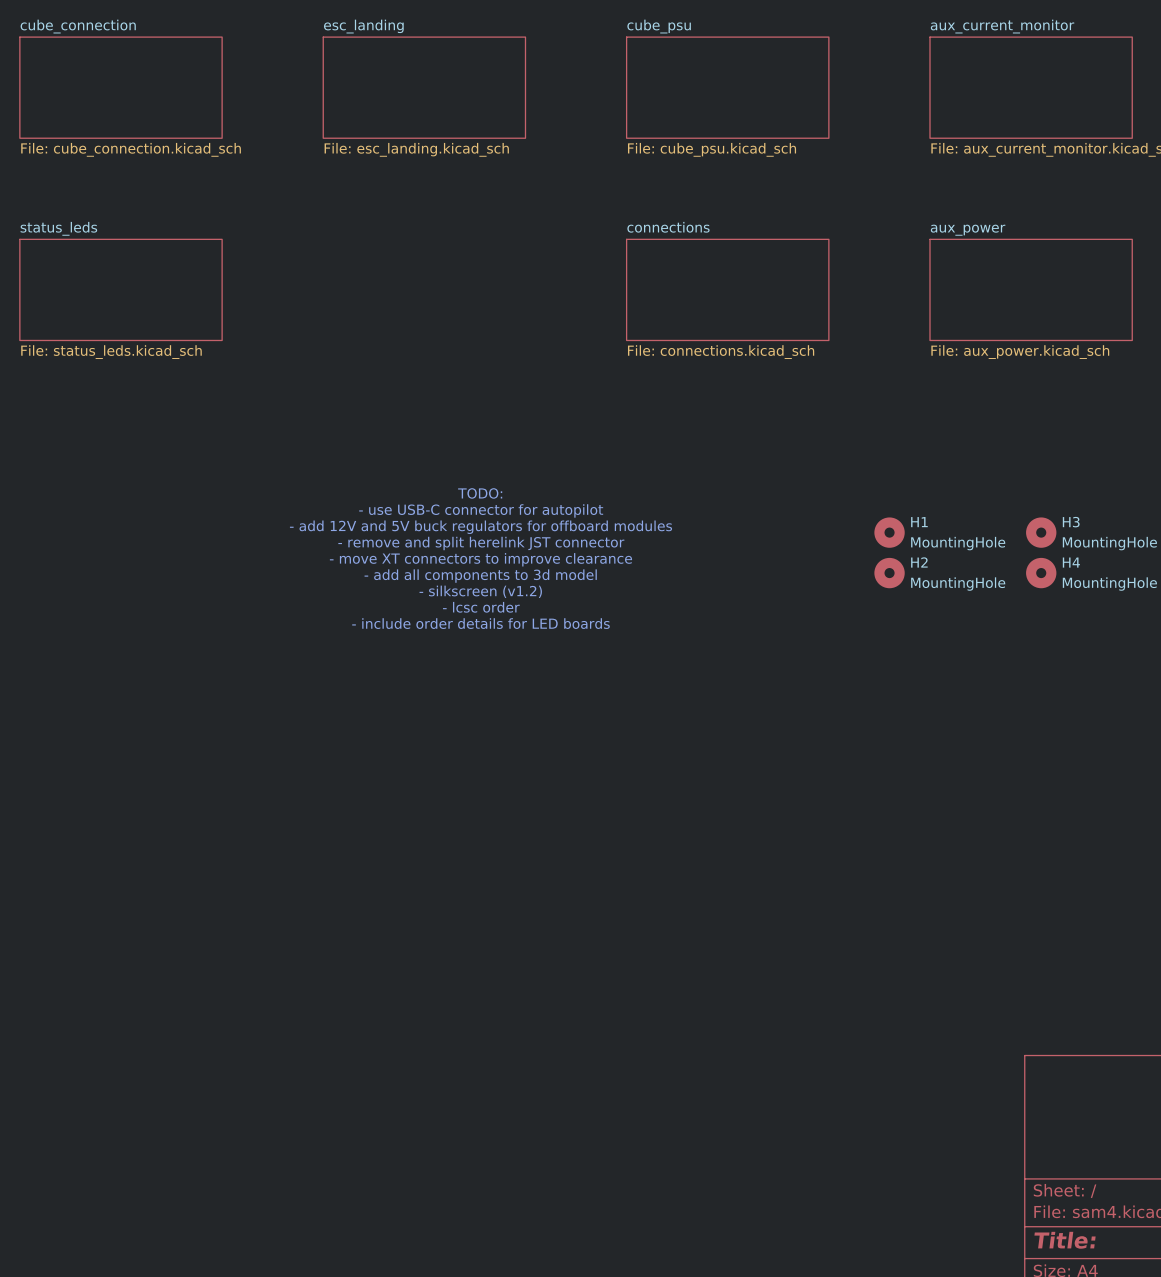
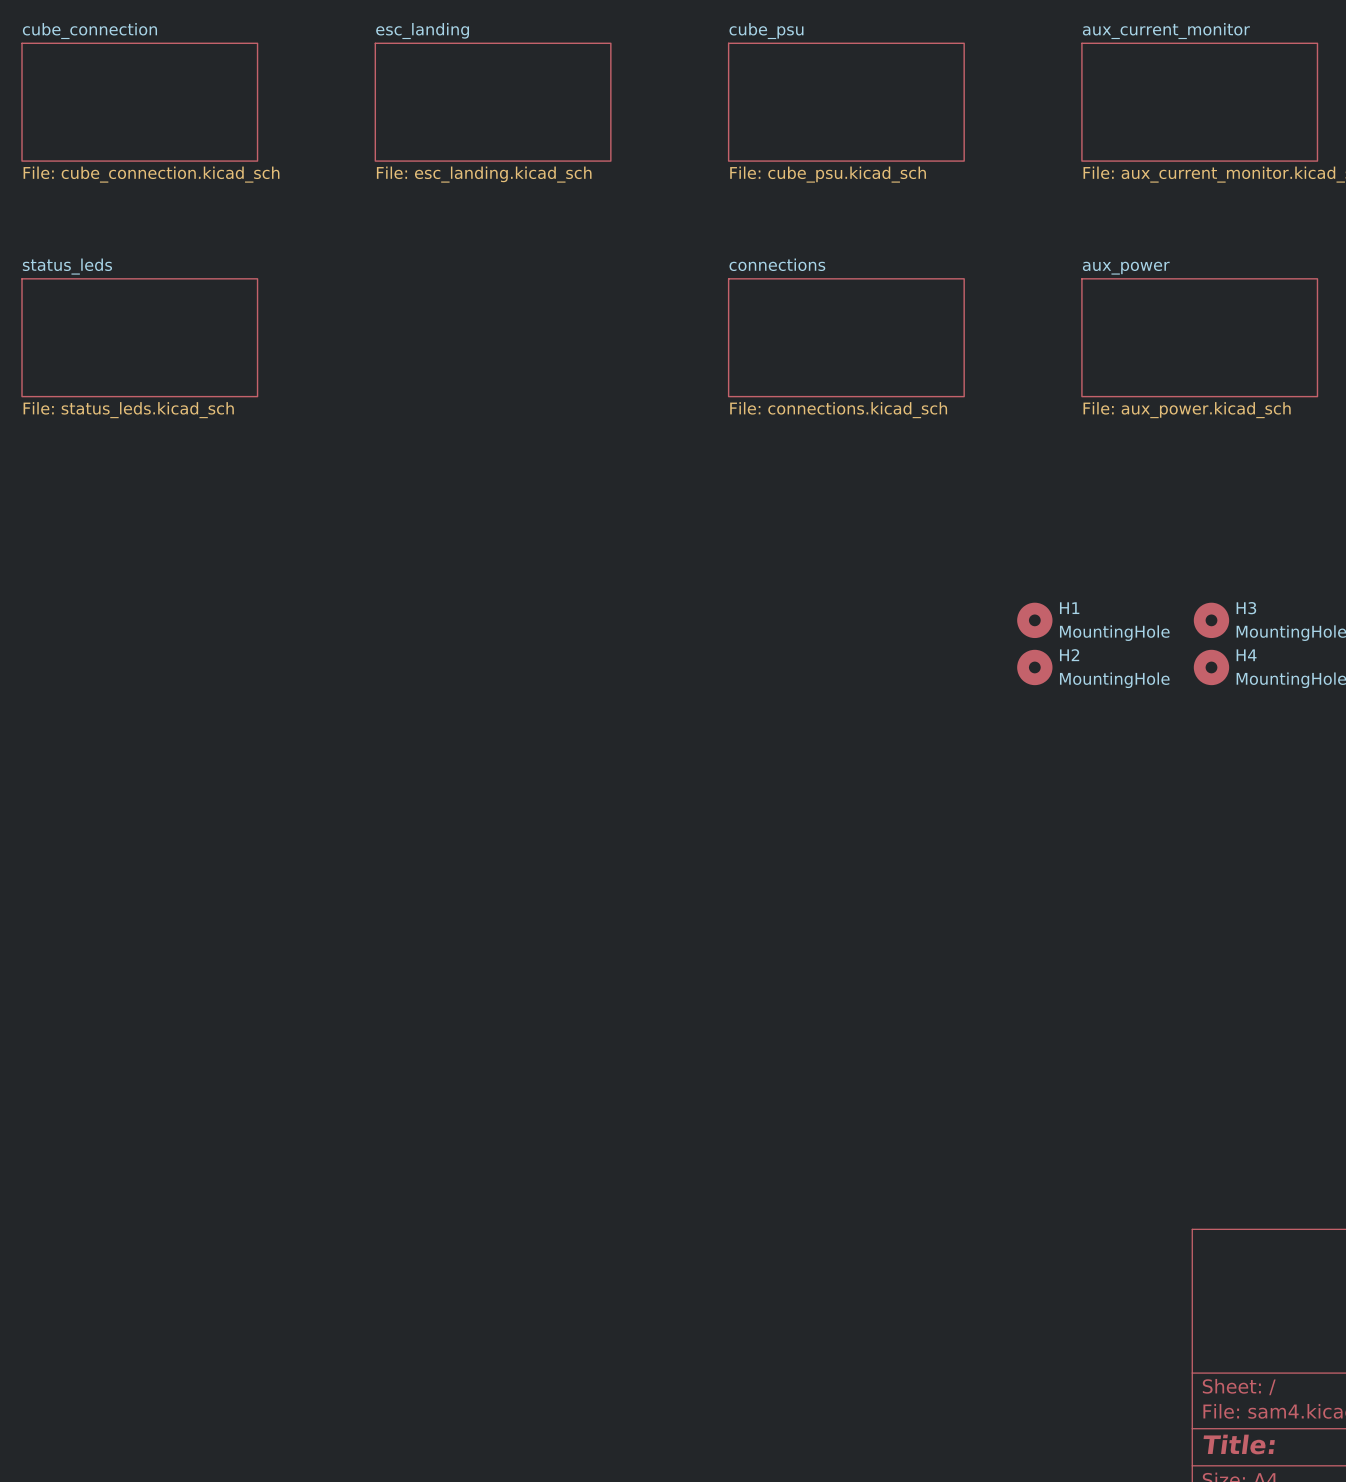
text: TODO: (480, 493) -> none
text: - use USB-C connector for autopilot (481, 510) -> none
text: - add 12V and 5V buck regulators for offboard modules (481, 527) -> none
text: - remove and split herelink JST connector (481, 543) -> none
text: - move XT connectors to improve clearance (480, 559) -> none
text: - add all components to 3d model (480, 576) -> none
text: - silkscreen (v1.2) (480, 591) -> none
text: - lcsc order (481, 607) -> none
text: - include order details for LED boards (481, 623) -> none

